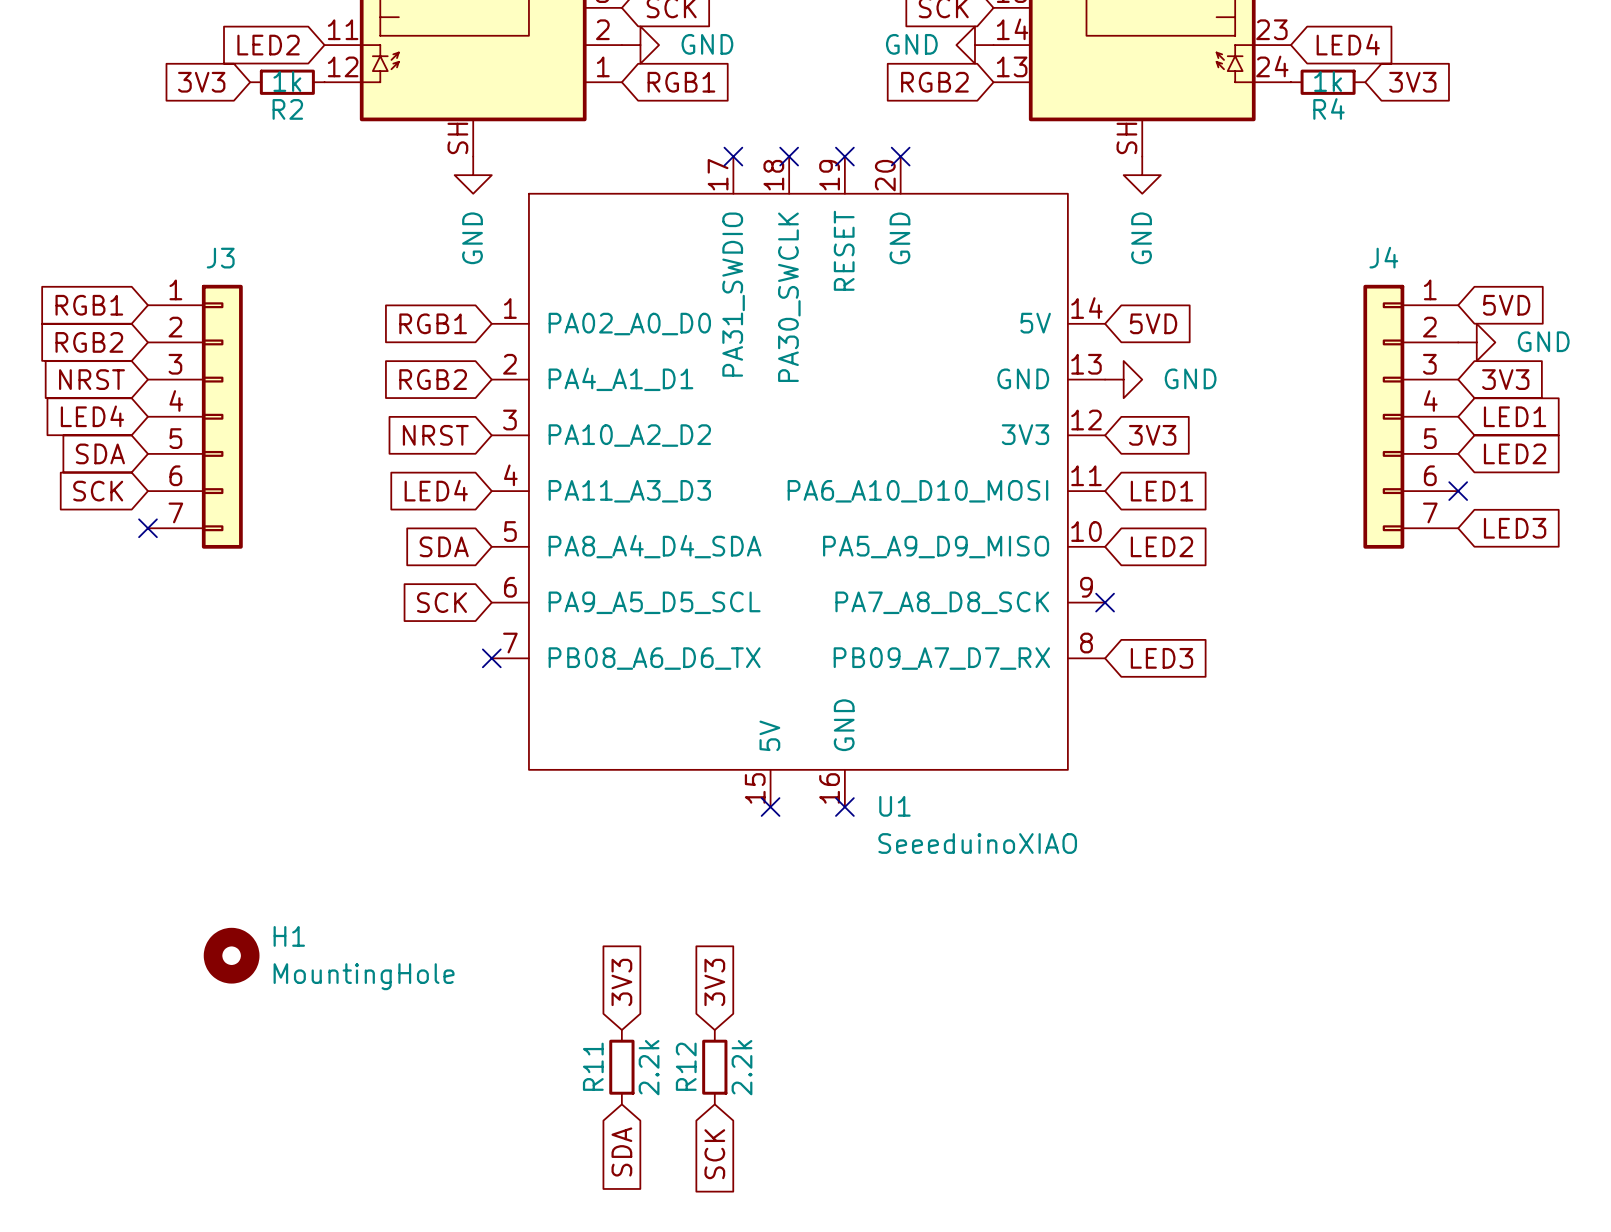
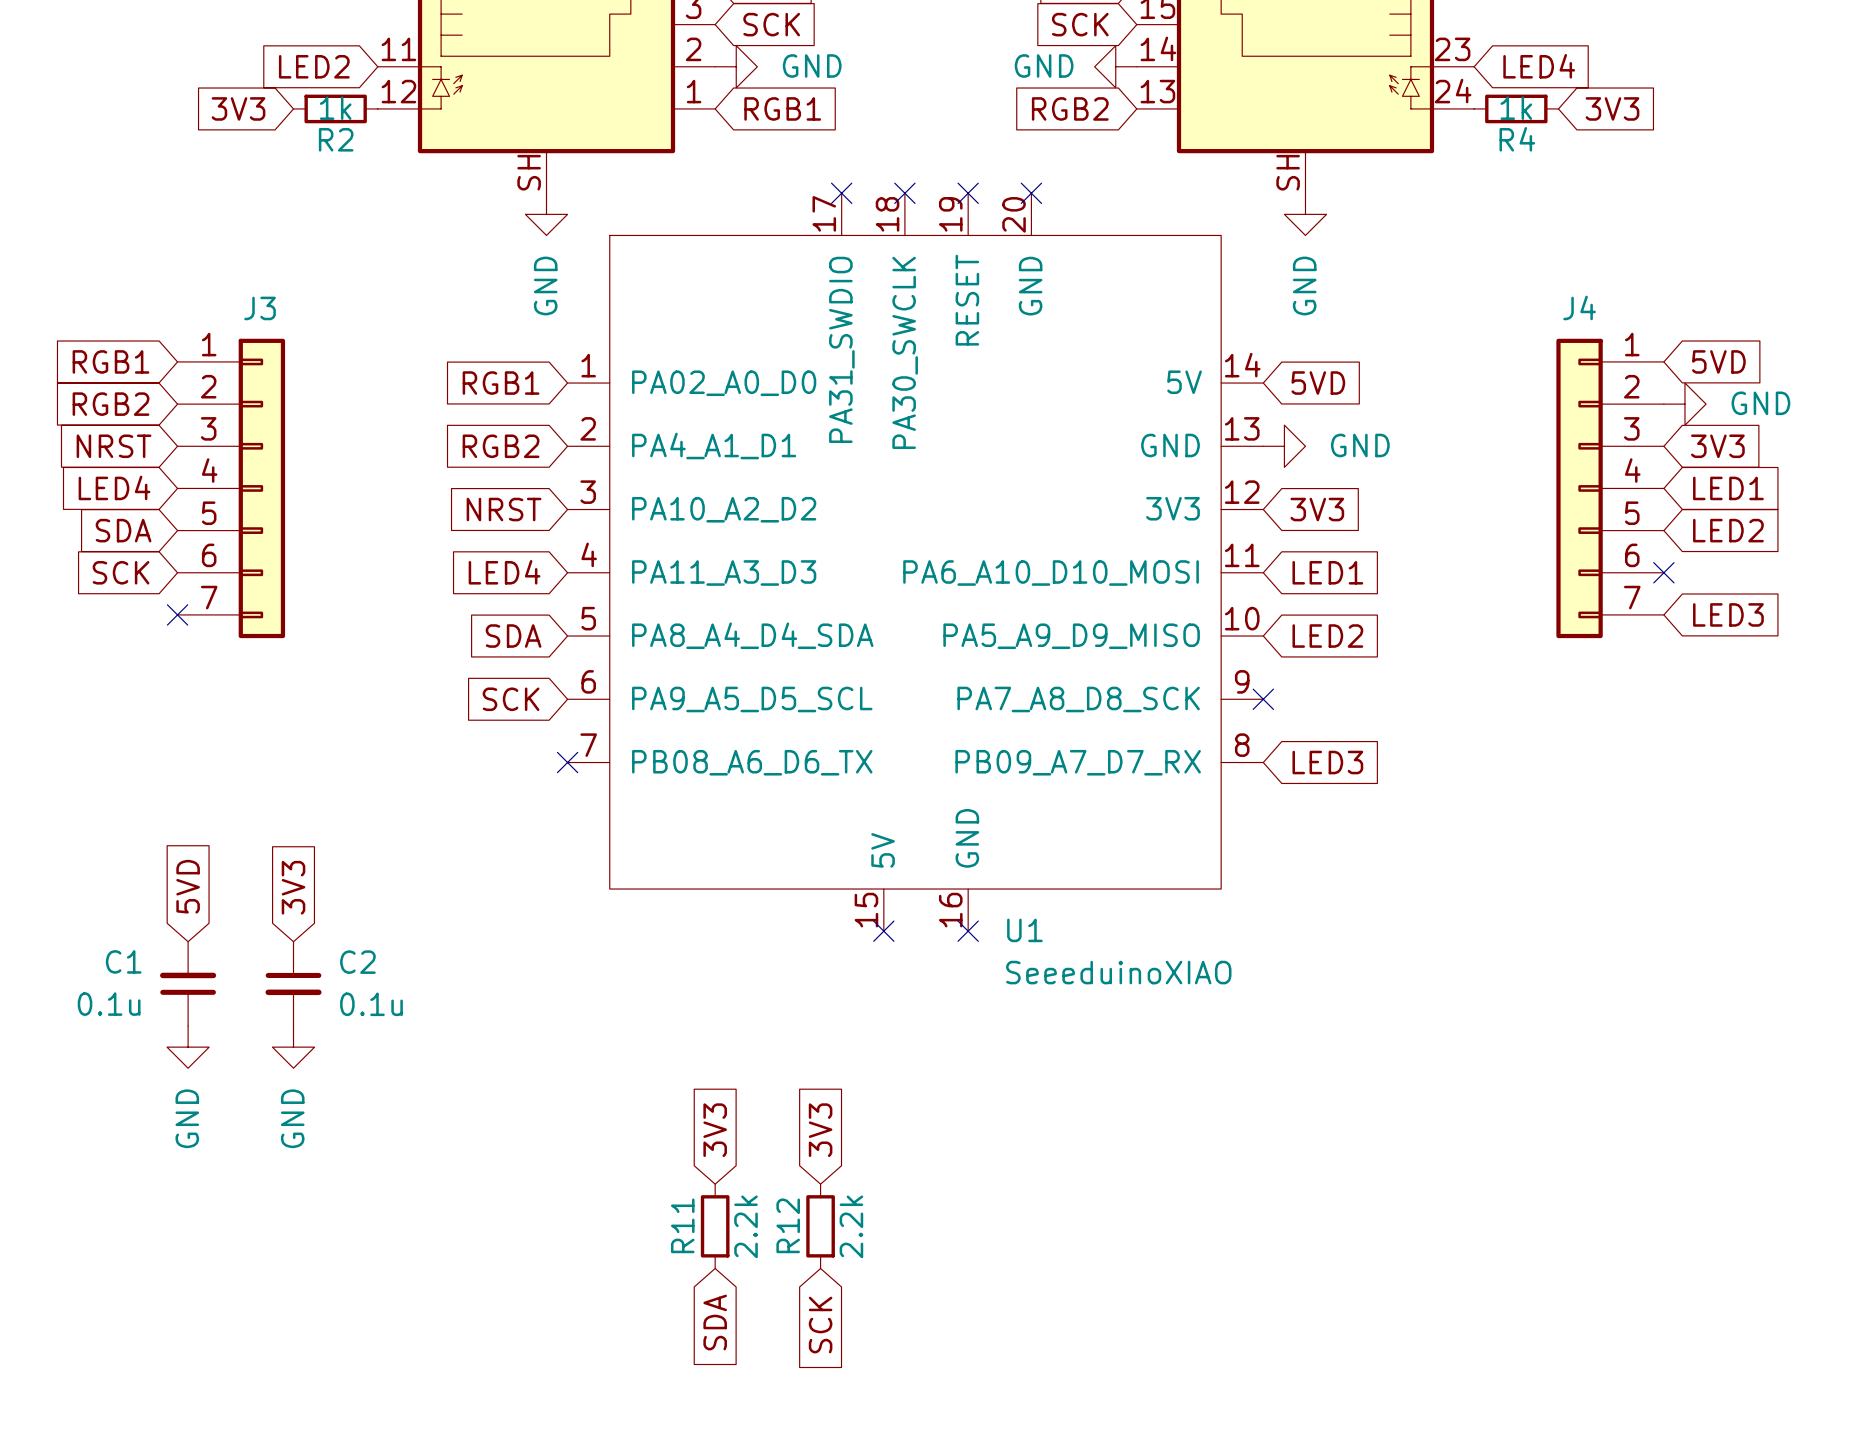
global label: none -> 5VD (188, 886)
global label: none -> 3V3 (293, 887)
C1: none -> 0.1u (188, 983)
C2: none -> 0.1u (293, 983)
power symbol: none -> GND (188, 1047)
power symbol: none -> GND (293, 1047)
H1: MountingHole (231, 955) -> none

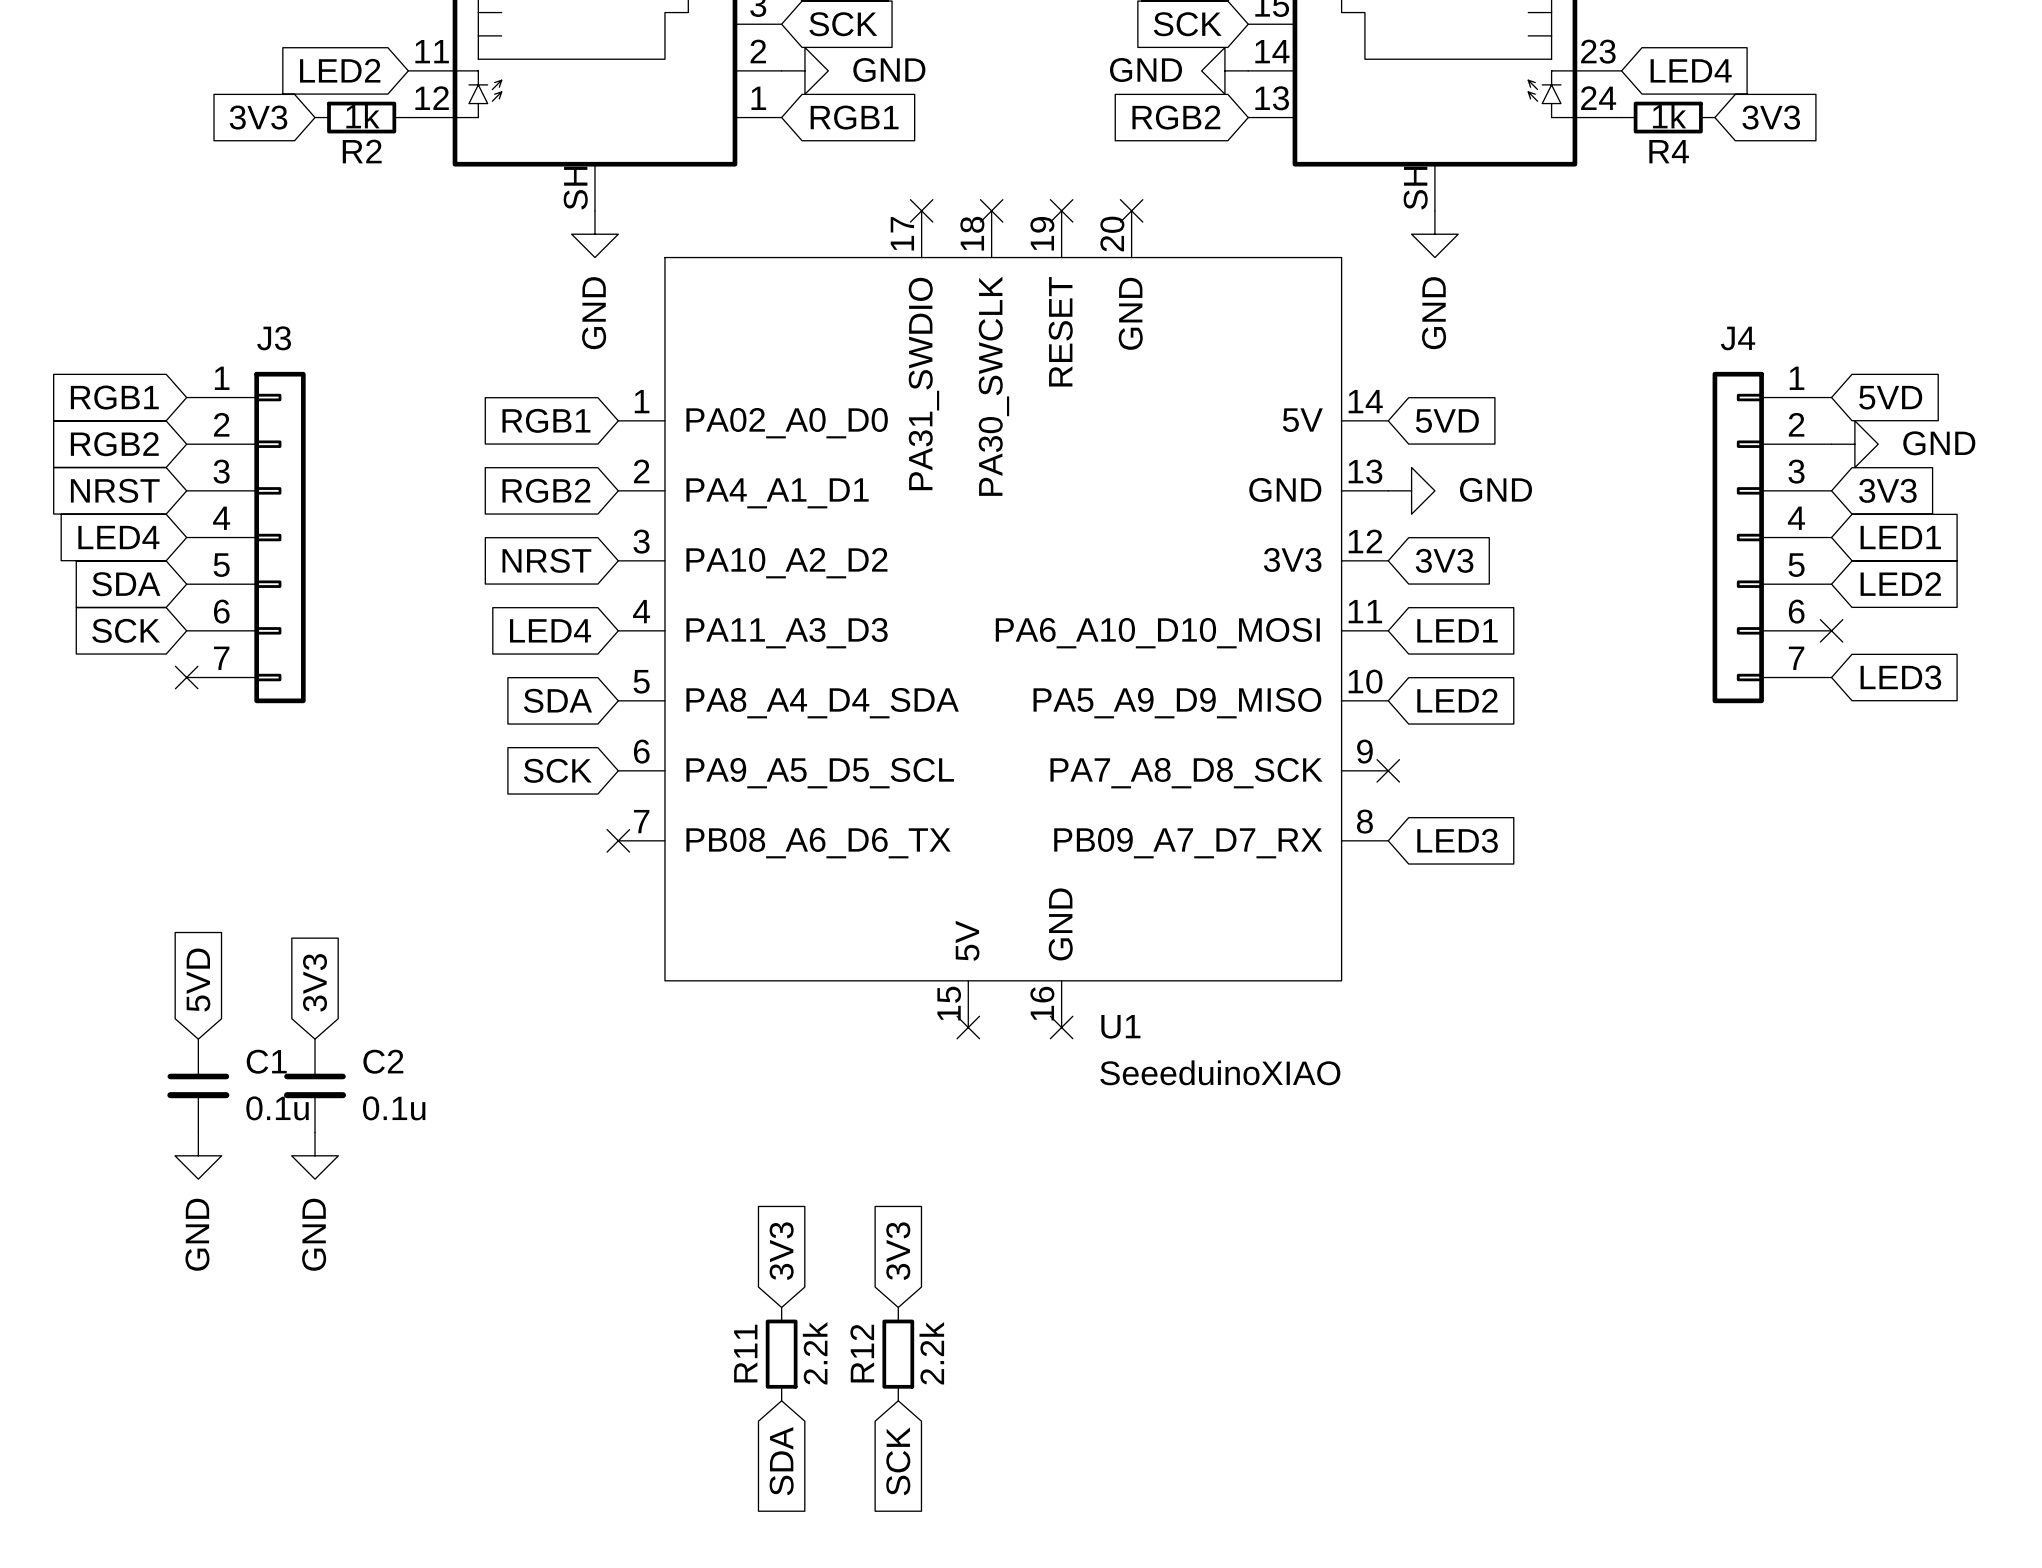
C1 name position: C1 (123, 961) -> C1 (266, 1061)
C1 rotation: 0° (188, 983) -> 180° (198, 1085)
C1 value position: 0.1u (109, 1004) -> 0.1u (277, 1108)

